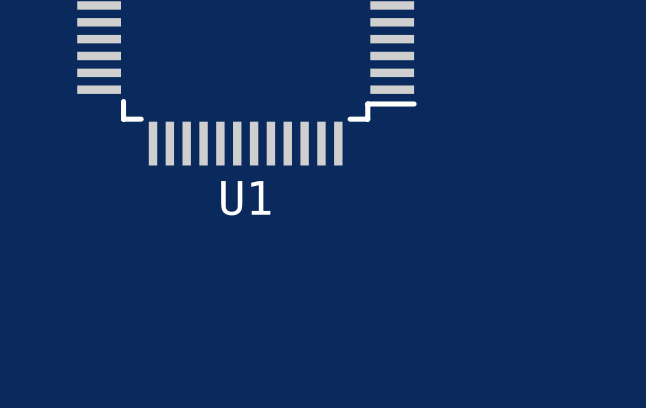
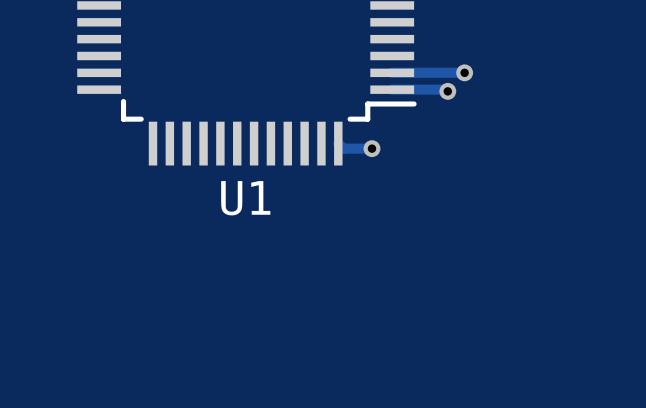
track: none -> (392, 72) (464, 72)
via: none -> (464, 72)
track: none -> (392, 89) (446, 89) (447, 91)
via: none -> (447, 91)
track: none -> (338, 143) (343, 148) (371, 148)
via: none -> (371, 148)

